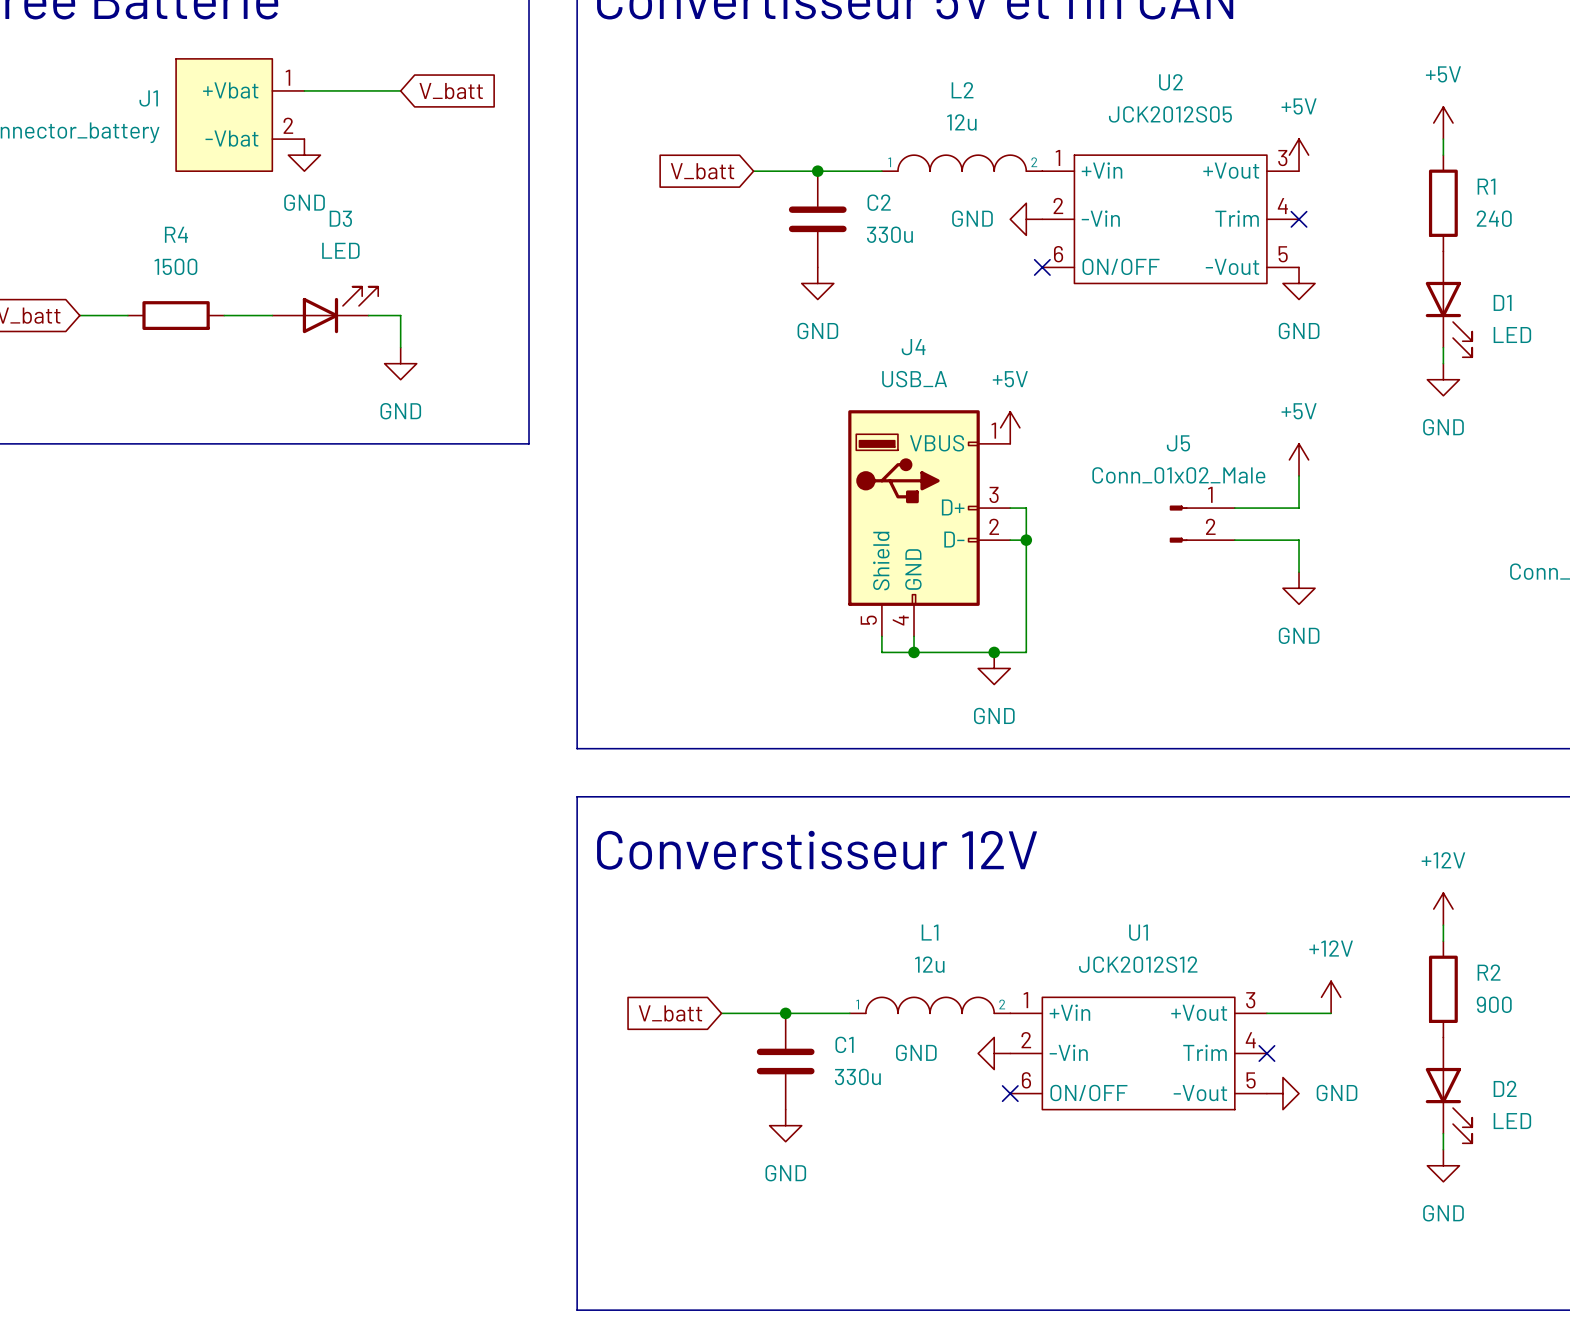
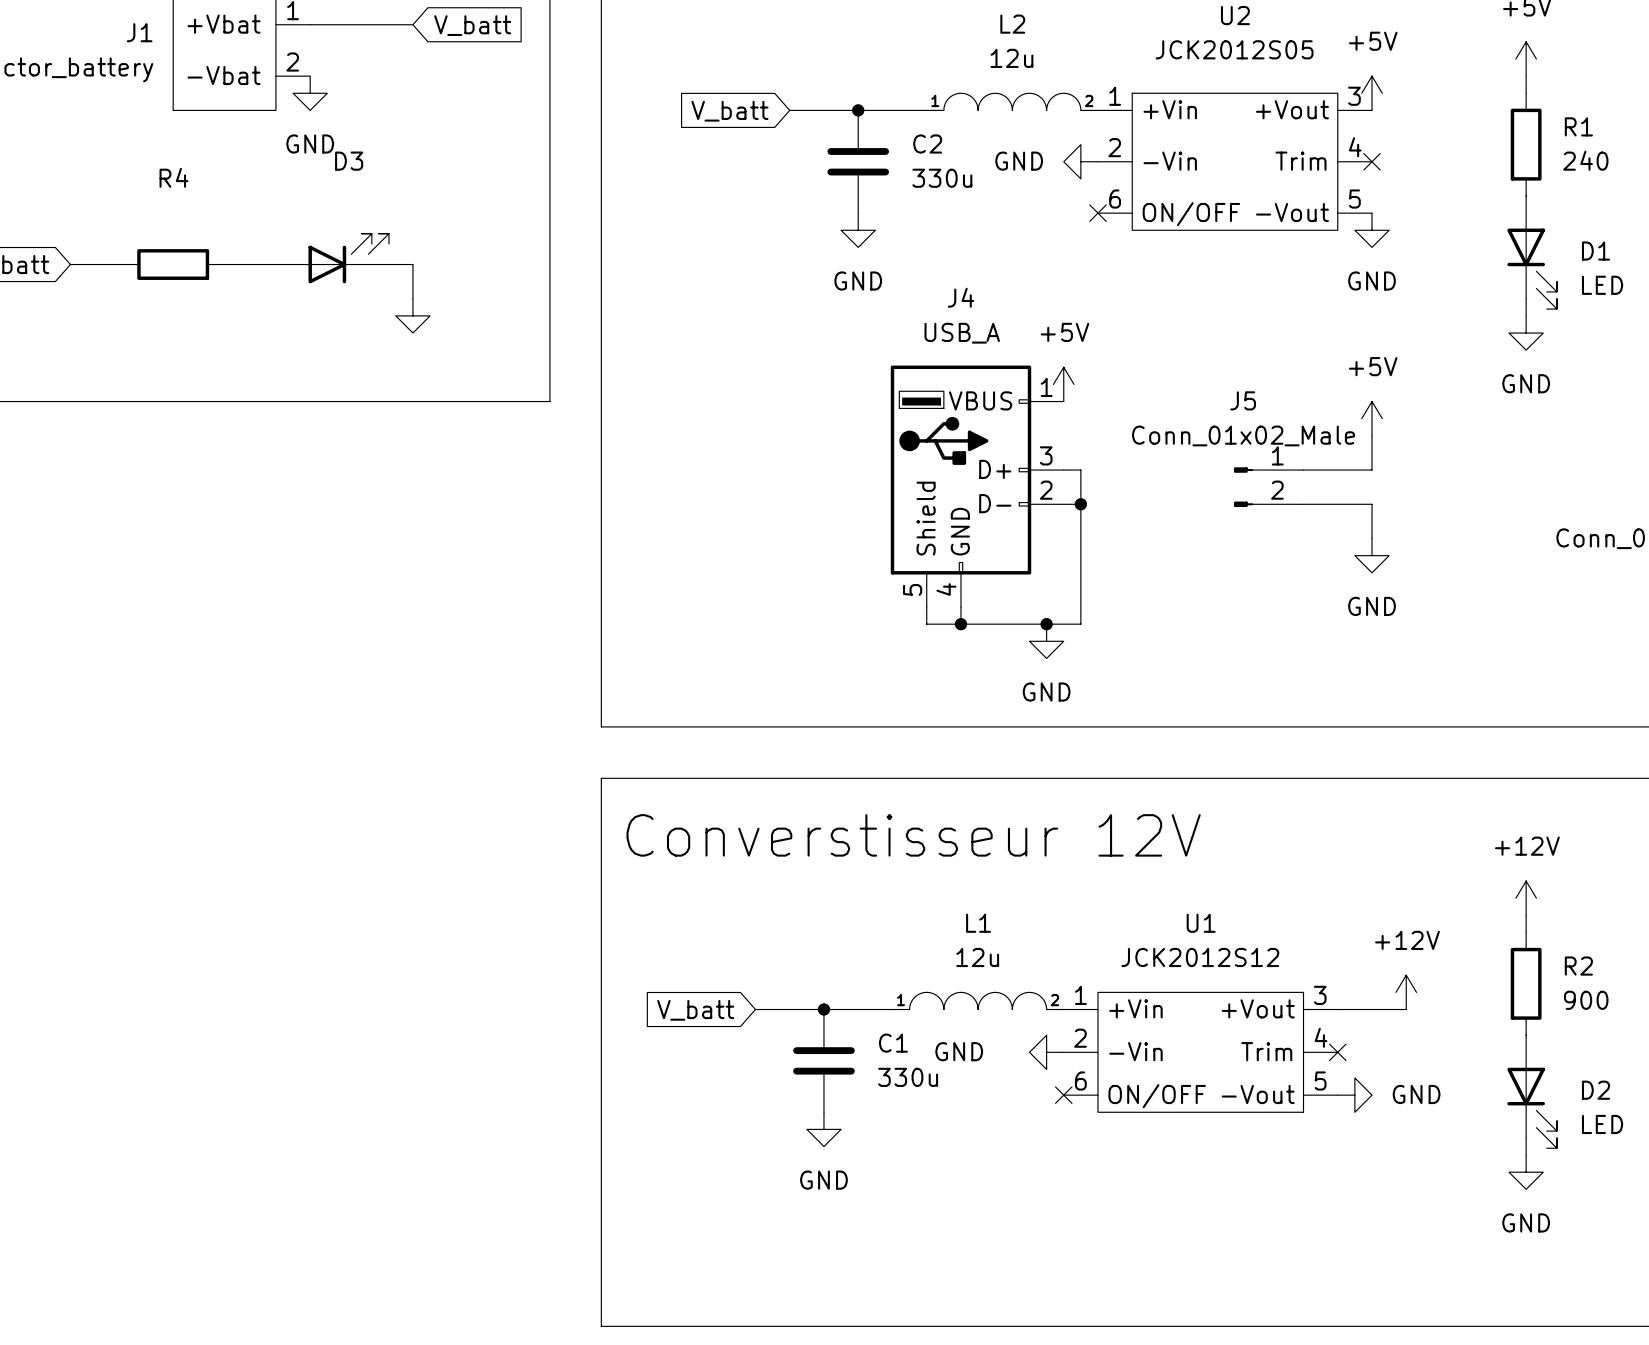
D3 value: LED (340, 250) -> none
R4 value: 1500 (175, 266) -> none
power symbol text: GND (400, 411) -> none

